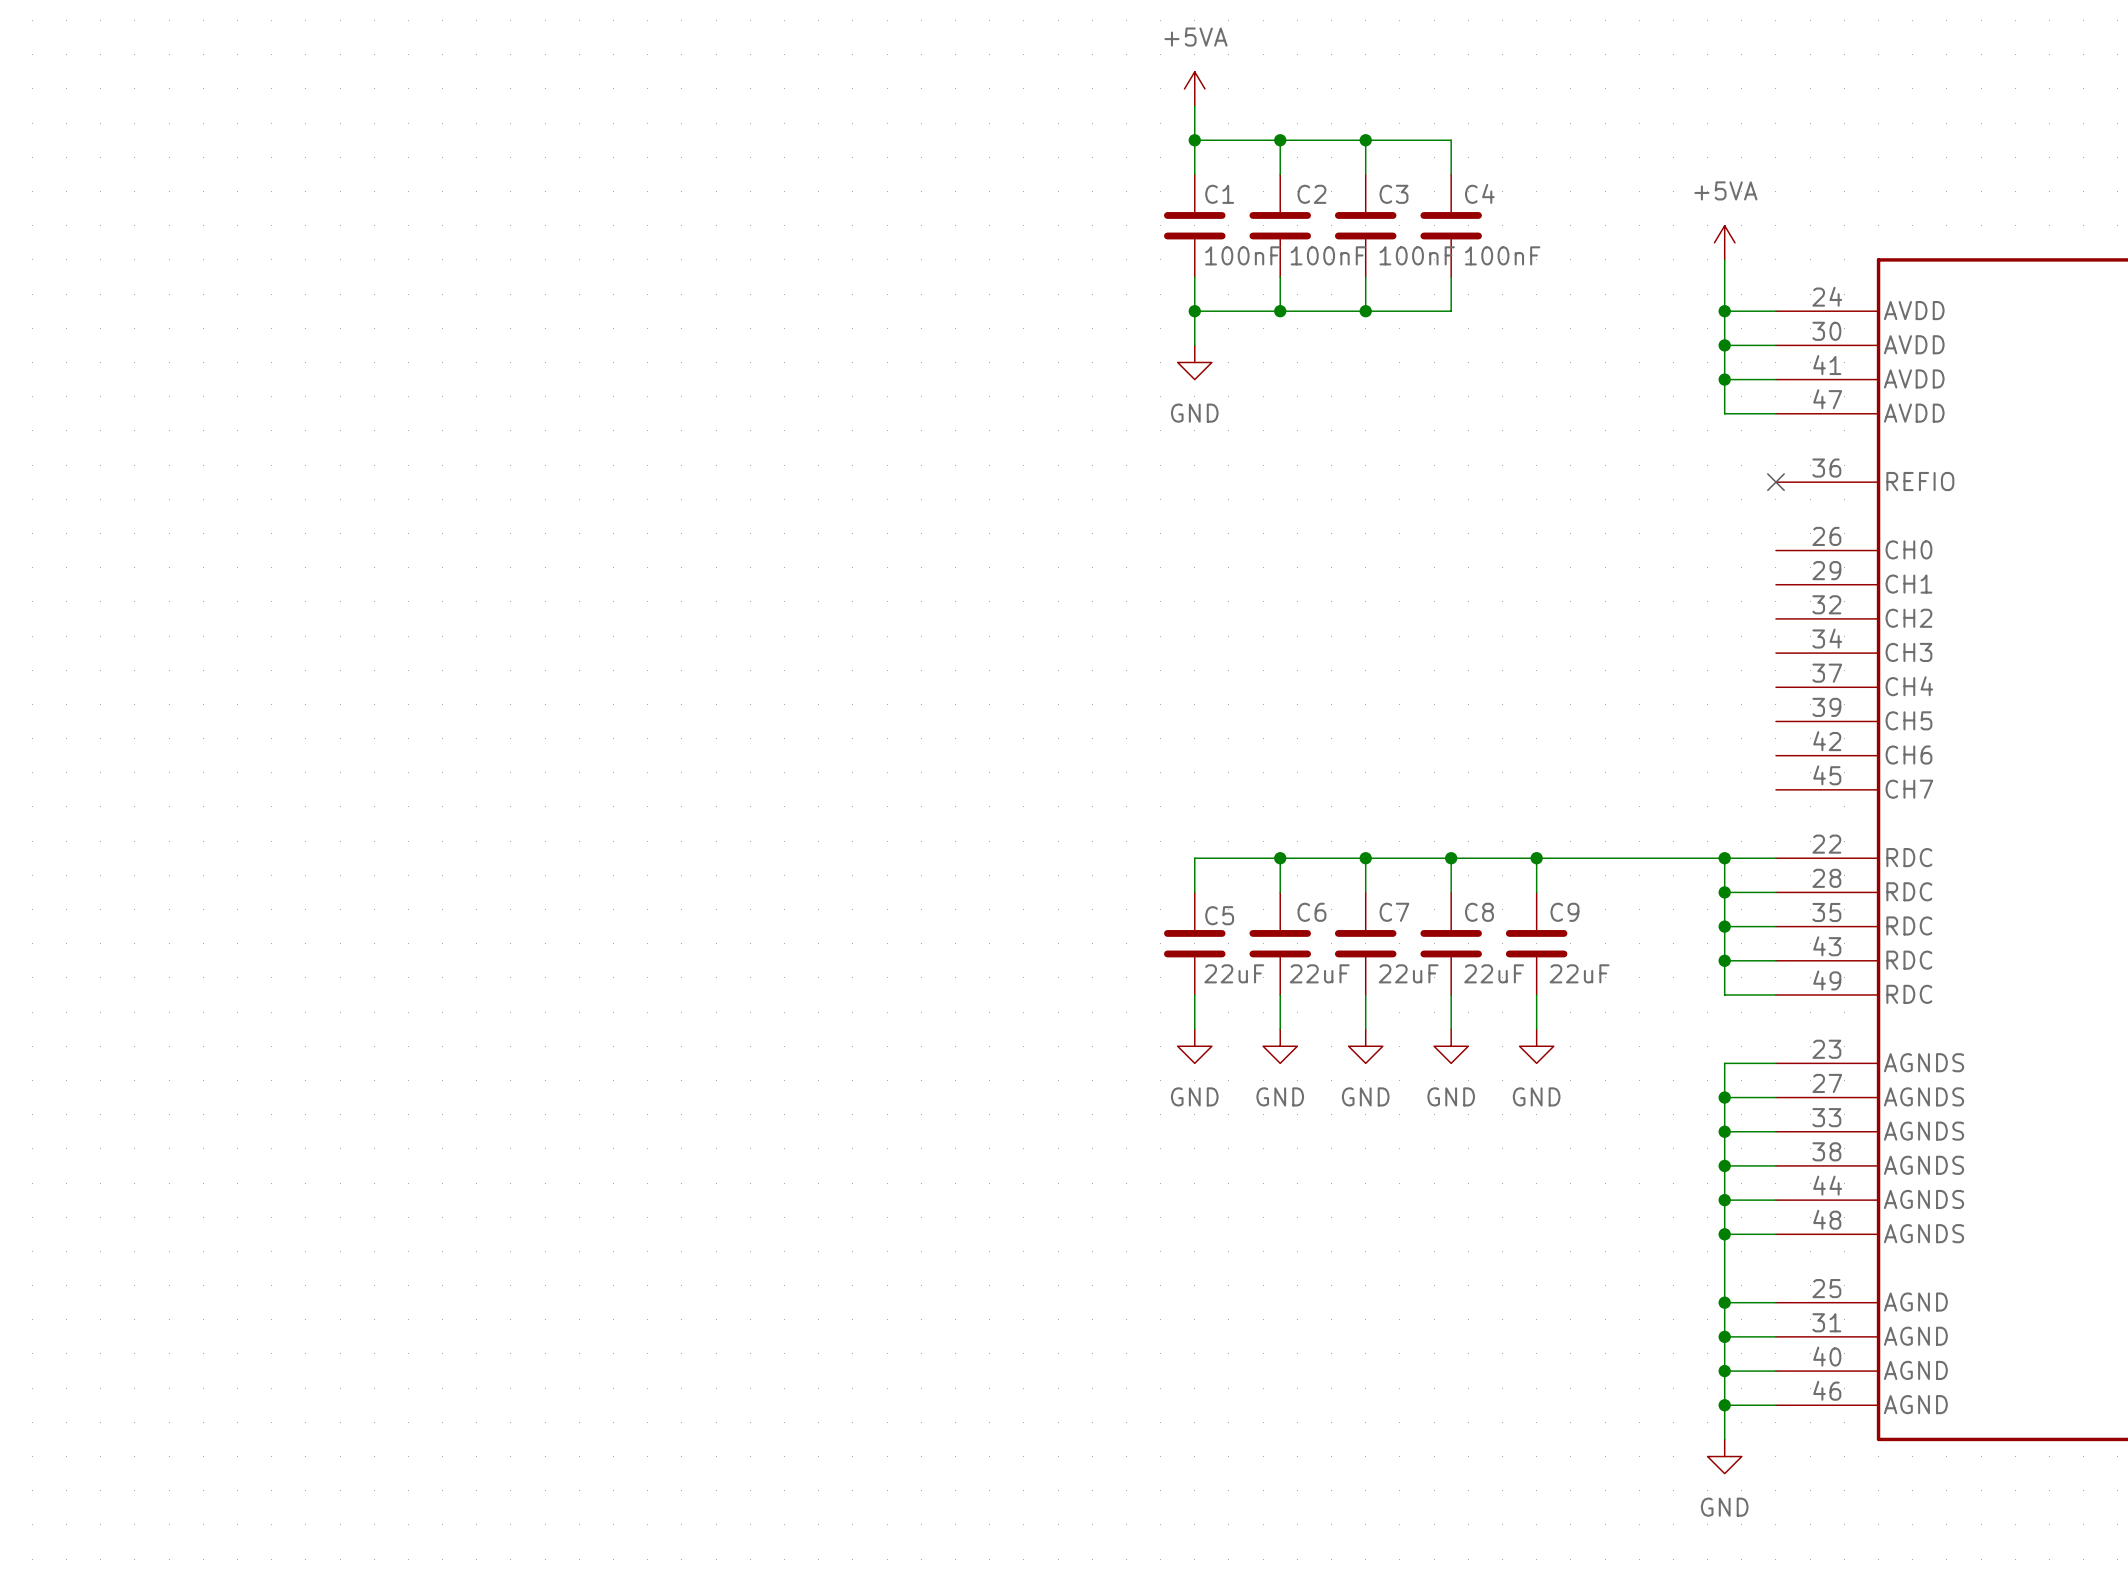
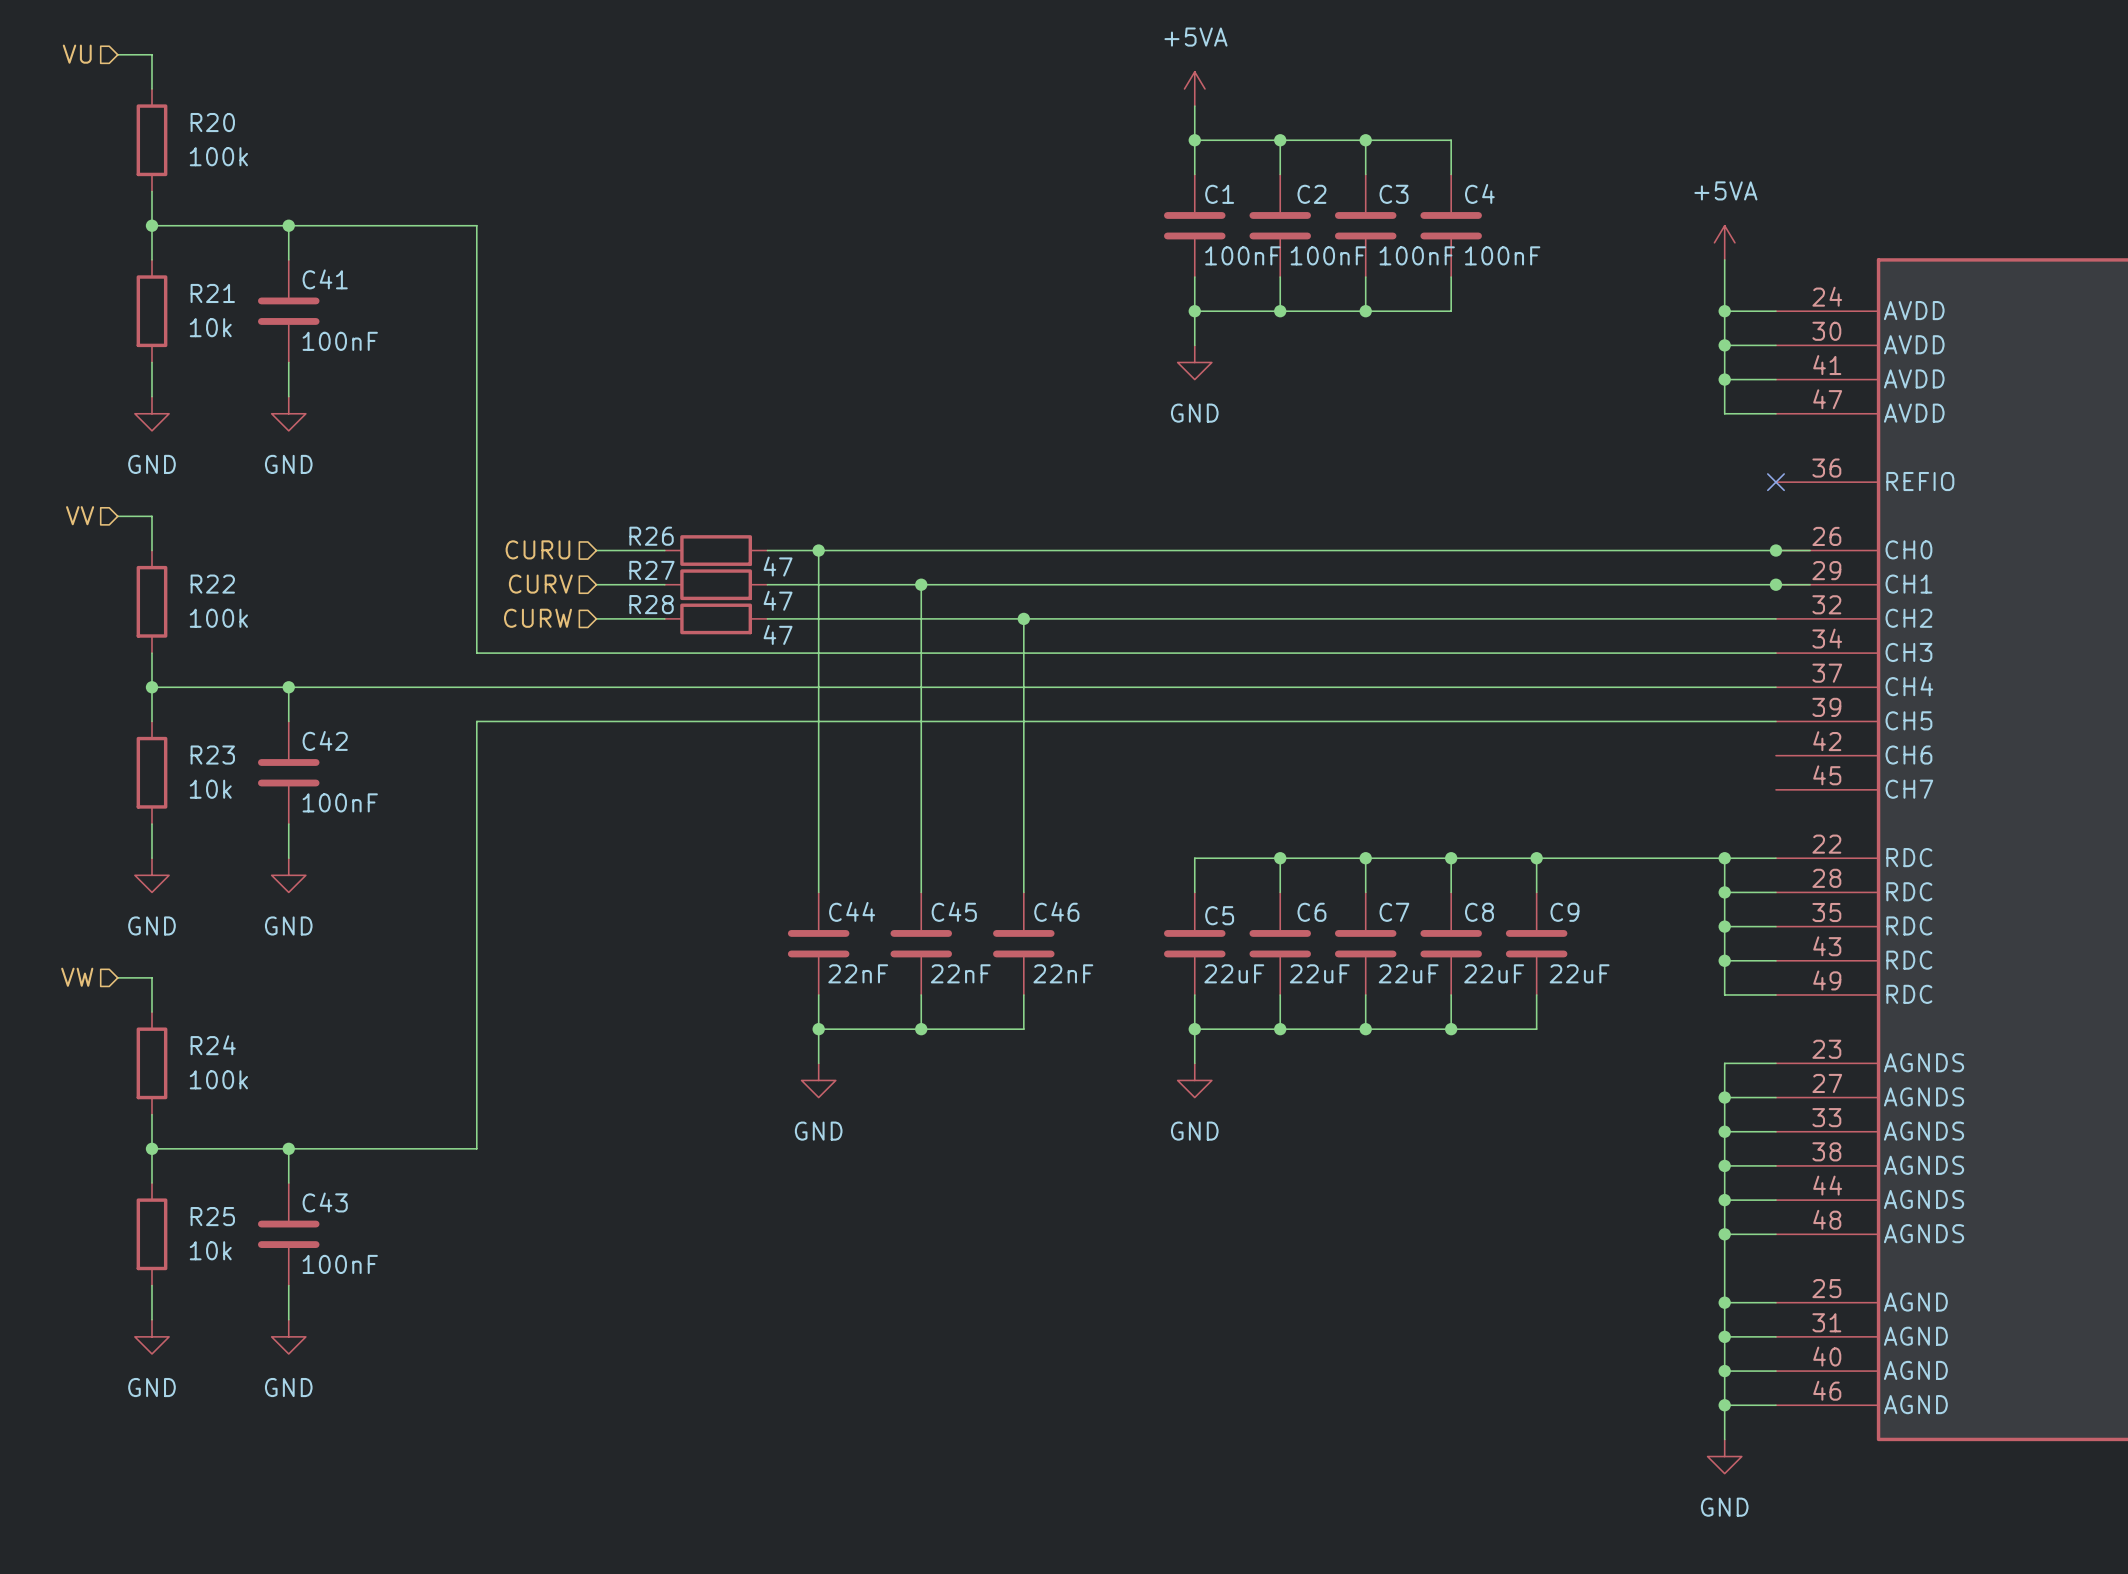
hierarchical label: none -> VU (77, 54)
wire: none -> (117, 54) (151, 54) (151, 88)
R20: none -> 100k (151, 140)
wire: none -> (151, 191) (151, 259)
wire: none -> (151, 225) (476, 225) (476, 653) (1775, 653)
junction: none -> (151, 225)
wire: none -> (288, 225) (288, 259)
junction: none -> (288, 225)
R21: none -> 10k (151, 311)
C41: none -> 100nF (288, 311)
wire: none -> (151, 362) (151, 396)
wire: none -> (288, 362) (288, 396)
power symbol: none -> GND (151, 413)
power symbol: none -> GND (288, 413)
hierarchical label: none -> VV (80, 515)
wire: none -> (117, 516) (151, 516) (151, 550)
hierarchical label: none -> CURU (537, 549)
wire: none -> (596, 550) (664, 550)
R26: none -> 47 (716, 550)
wire: none -> (767, 550) (1810, 550)
wire: none -> (818, 550) (818, 892)
junction: none -> (818, 550)
junction: none -> (1775, 550)
hierarchical label: none -> CURV (540, 584)
wire: none -> (596, 584) (664, 584)
R27: none -> 47 (716, 584)
wire: none -> (767, 584) (1810, 584)
wire: none -> (921, 584) (921, 892)
junction: none -> (921, 584)
junction: none -> (1775, 584)
R22: none -> 100k (151, 601)
hierarchical label: none -> CURW (537, 618)
wire: none -> (596, 618) (664, 618)
R28: none -> 47 (716, 618)
wire: none -> (767, 618) (1775, 618)
wire: none -> (1023, 618) (1023, 892)
junction: none -> (1023, 618)
wire: none -> (151, 653) (151, 721)
wire: none -> (151, 687) (1775, 687)
junction: none -> (151, 687)
wire: none -> (288, 687) (288, 721)
junction: none -> (288, 687)
wire: none -> (1775, 721) (476, 721) (476, 1148) (151, 1148)
R23: none -> 10k (151, 772)
C42: none -> 100nF (288, 772)
wire: none -> (151, 824) (151, 858)
wire: none -> (288, 824) (288, 858)
power symbol: none -> GND (151, 875)
power symbol: none -> GND (288, 875)
C44: none -> 22nF (818, 943)
C45: none -> 22nF (921, 943)
C46: none -> 22nF (1023, 943)
hierarchical label: none -> VW (77, 977)
wire: none -> (117, 977) (151, 977) (151, 1012)
wire: none -> (818, 994) (818, 1063)
wire: none -> (921, 994) (921, 1029)
wire: none -> (1023, 994) (1023, 1029) (818, 1029)
junction: none -> (818, 1029)
junction: none -> (921, 1029)
junction: none -> (1194, 1029)
junction: none -> (1280, 1029)
junction: none -> (1365, 1029)
junction: none -> (1451, 1029)
wire: none -> (1536, 1029) (1194, 1029) (1194, 1063)
power symbol position: GND (1194, 1046) -> GND (1194, 1080)
power symbol: GND (1280, 1046) -> none
power symbol: GND (1365, 1046) -> none
power symbol: GND (1451, 1046) -> none
power symbol: GND (1536, 1046) -> none
R24: none -> 100k (151, 1063)
power symbol: none -> GND (818, 1080)
wire: none -> (151, 1114) (151, 1183)
junction: none -> (151, 1148)
wire: none -> (288, 1148) (288, 1183)
junction: none -> (288, 1148)
R25: none -> 10k (151, 1234)
C43: none -> 100nF (288, 1234)
wire: none -> (151, 1285) (151, 1319)
wire: none -> (288, 1285) (288, 1319)
power symbol: none -> GND (151, 1336)
power symbol: none -> GND (288, 1336)

